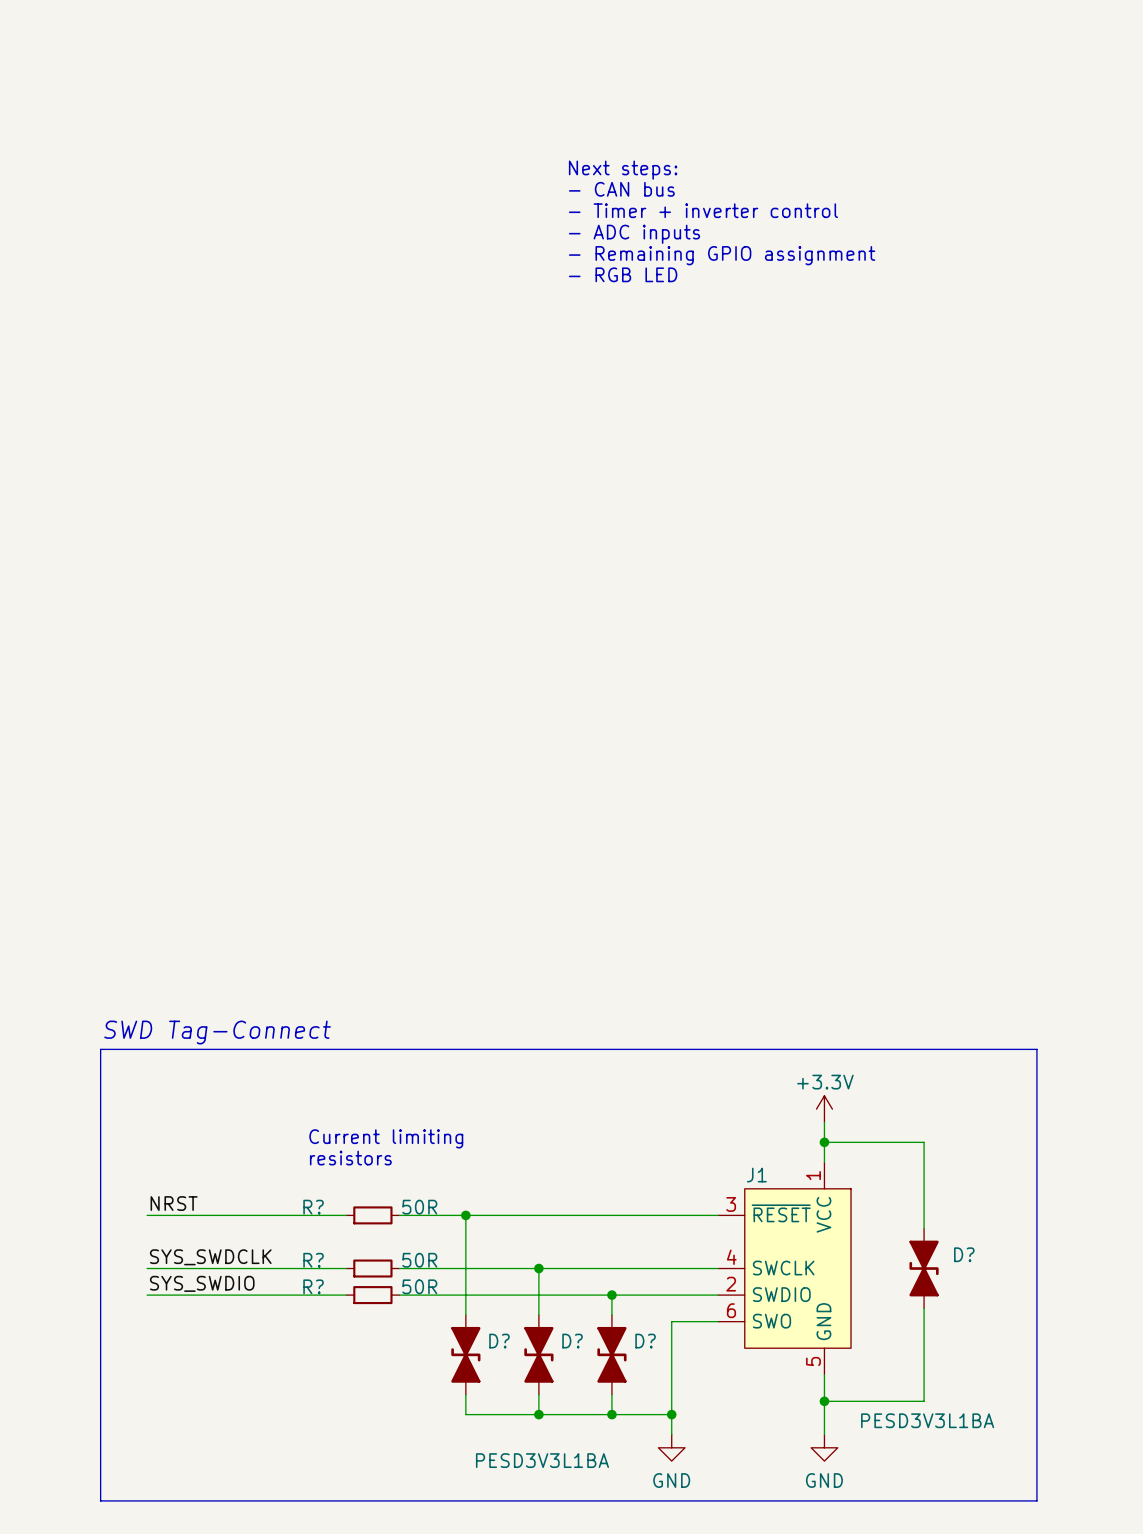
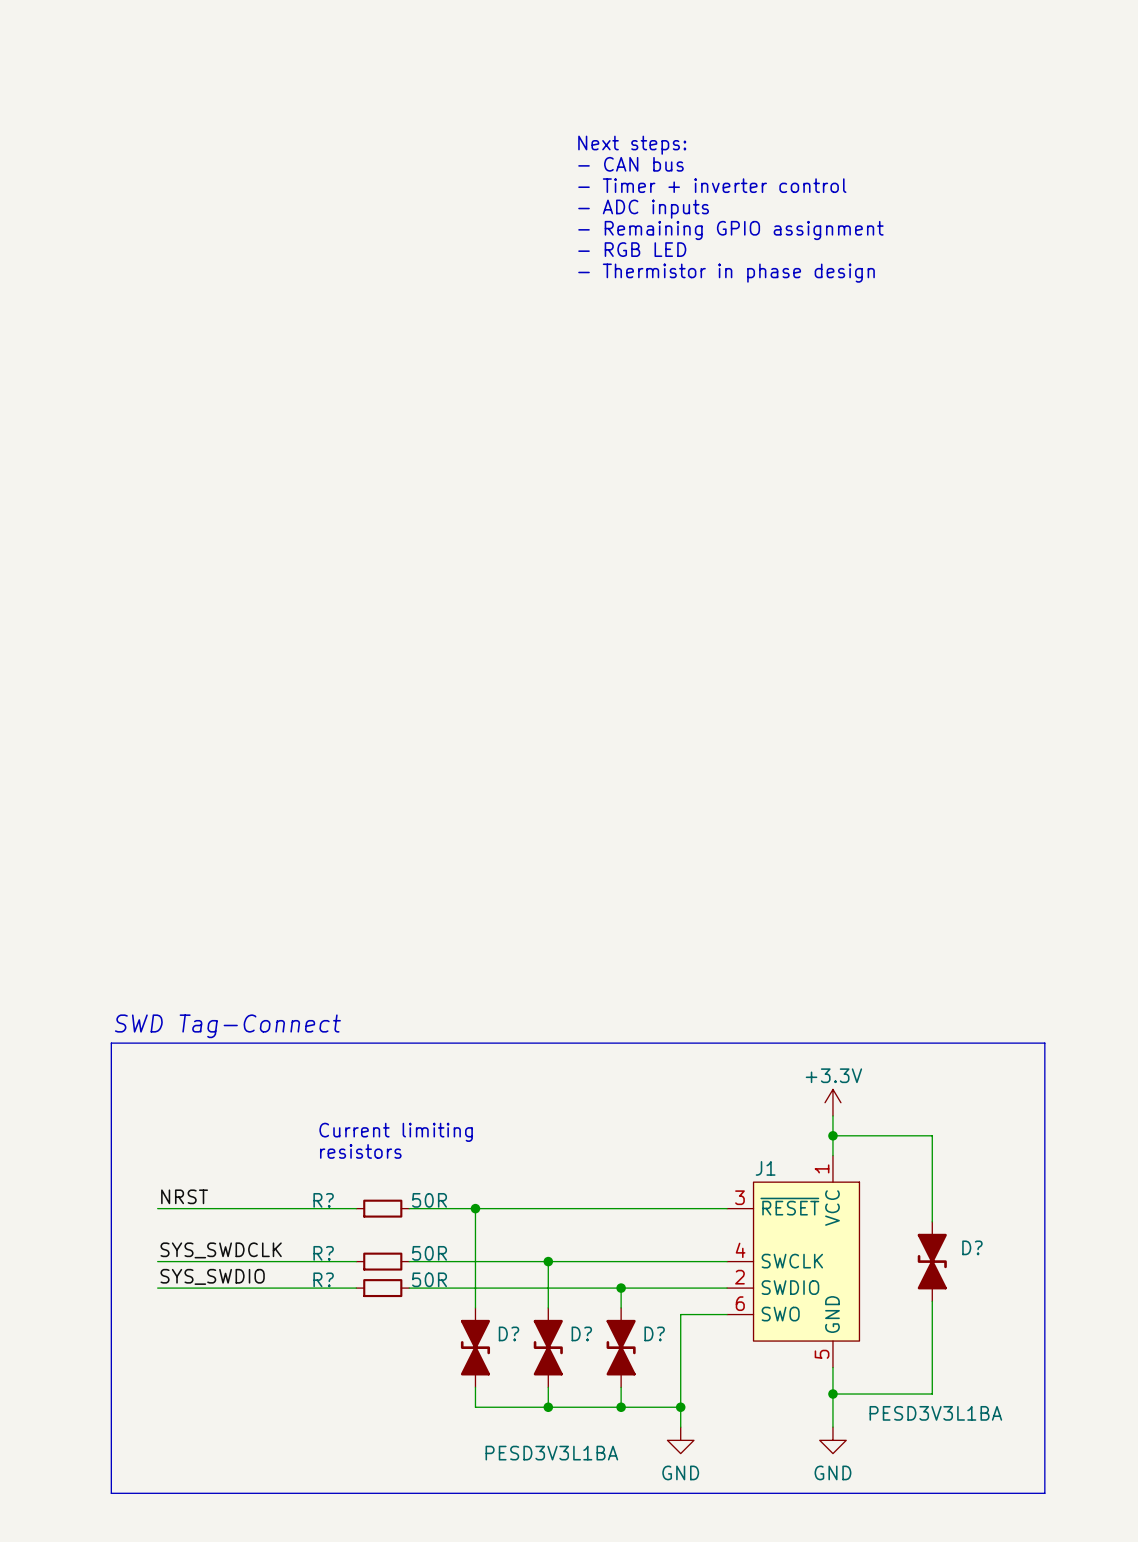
text: none -> Next steps: (632, 145)
text: Next steps: (623, 170) -> - CAN bus (630, 164)
text: - CAN bus (621, 189) -> - Timer + inverter control (712, 185)
text: - Timer + inverter control (703, 210) -> - ADC inputs (643, 209)
text: - ADC inputs (634, 234) -> - Remaining GPIO assignment (730, 230)
text: - Remaining GPIO assignment (722, 255) -> - RGB LED (632, 249)
text: - RGB LED (623, 274) -> - Thermistor in phase design (726, 273)

